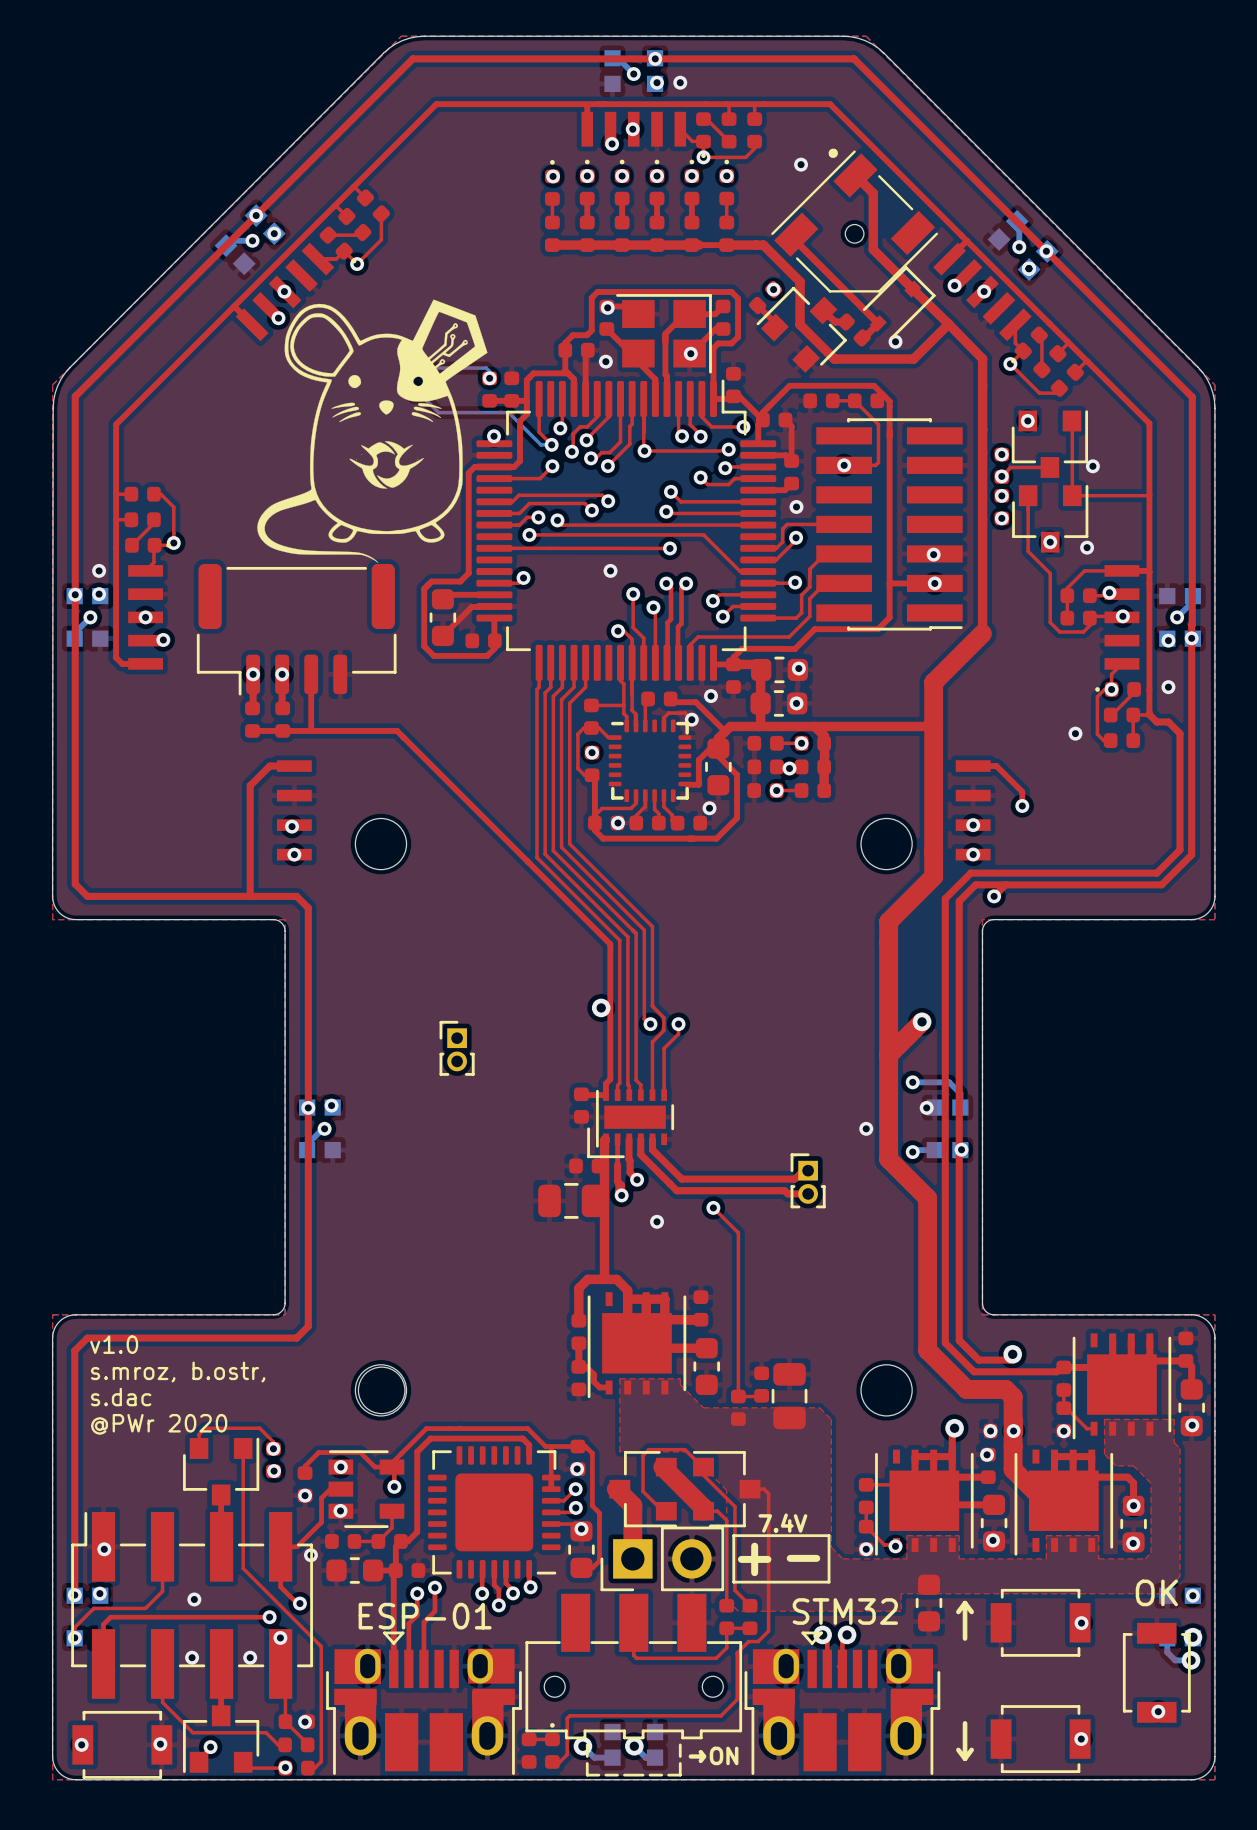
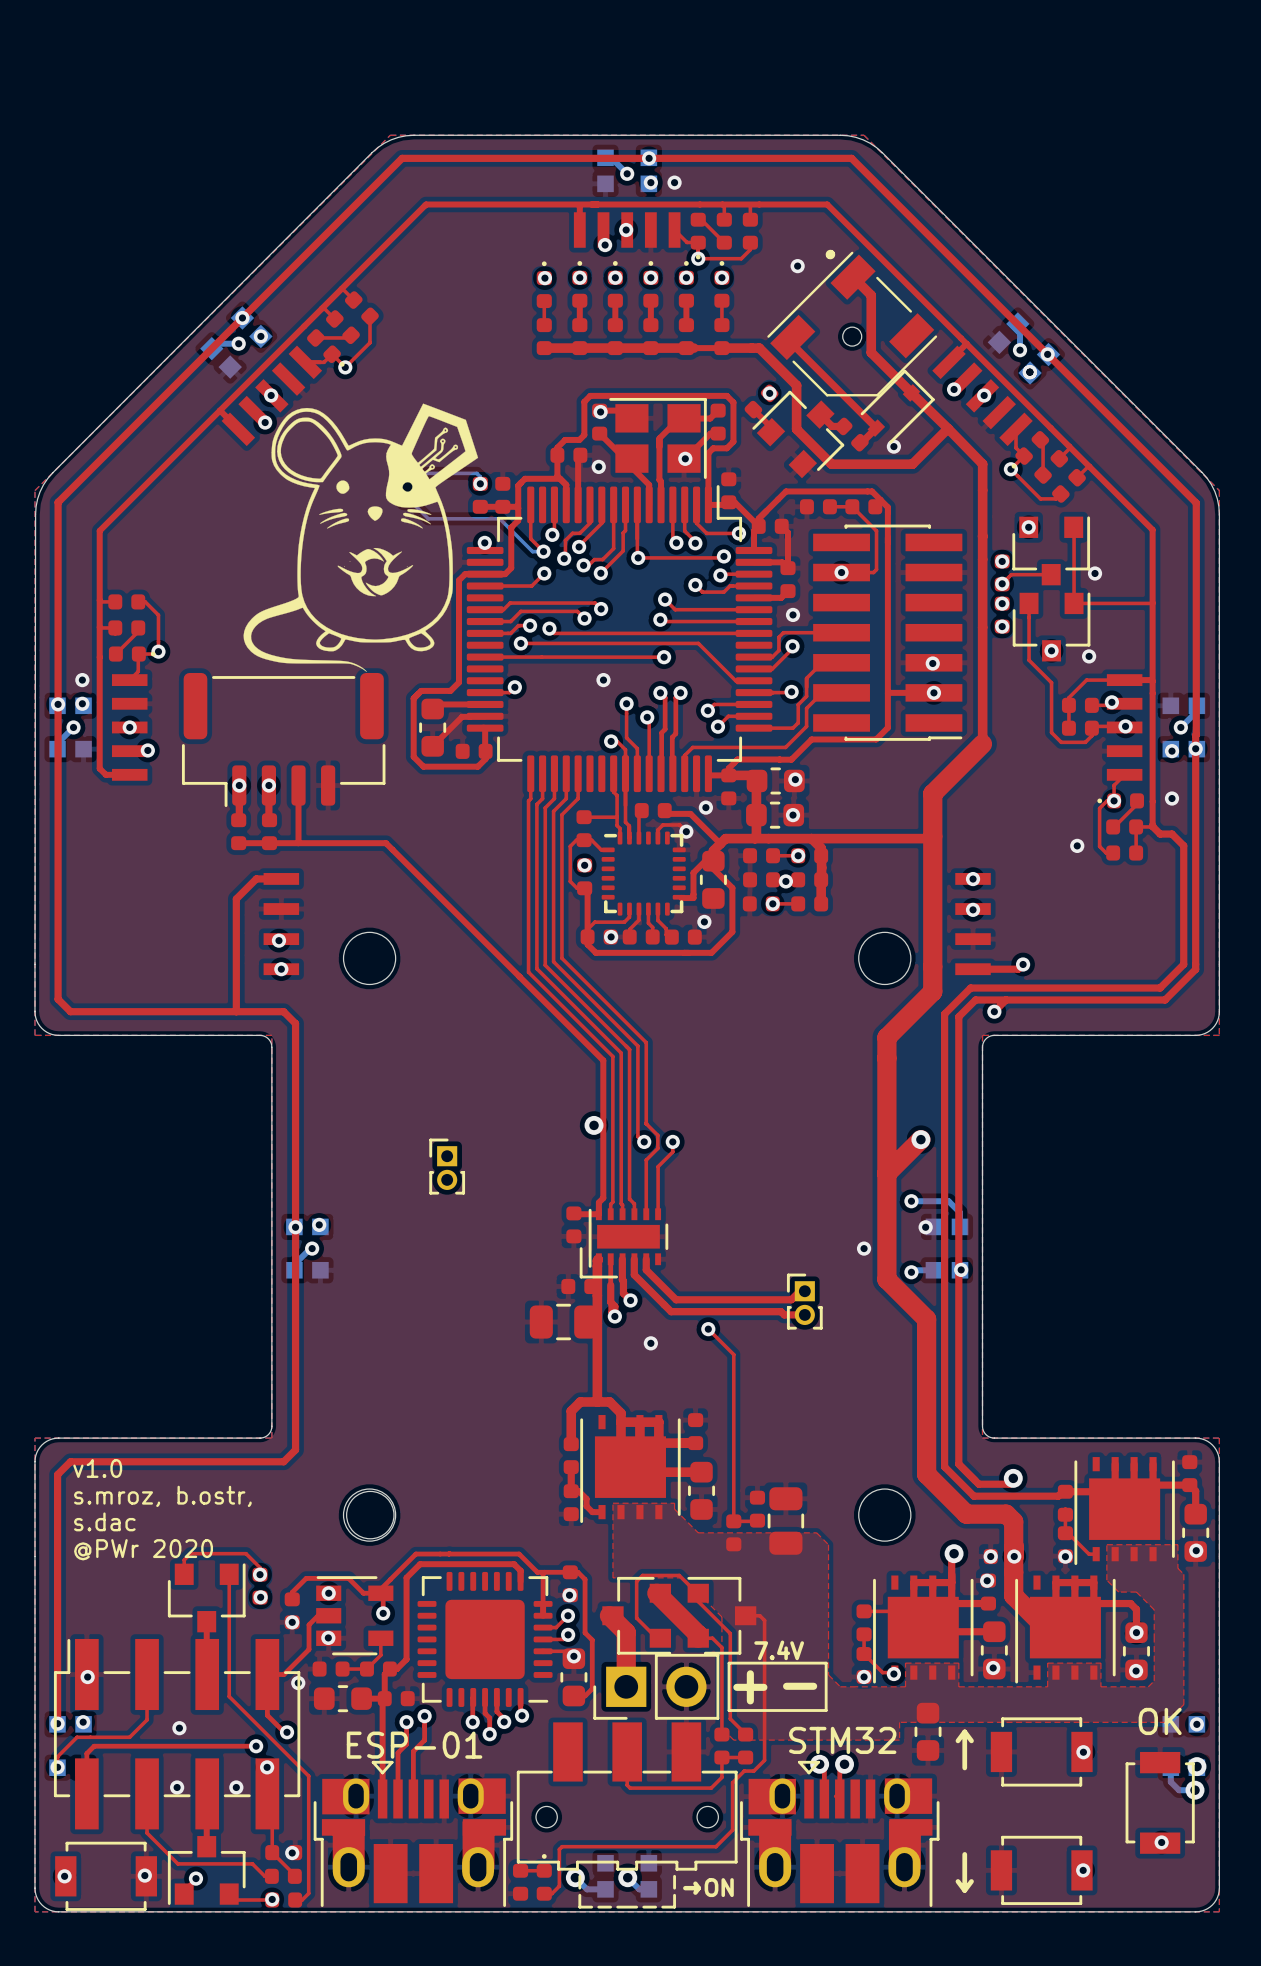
top track: (973, 766) (996, 766) (1022, 791) (1022, 805) -> none
via: none -> (973, 879)
via: none -> (973, 909)
via: (1022, 805) -> none
via: (973, 825) -> none
top track: none -> (1023, 964) (1018, 969) (973, 969)
via: none -> (1023, 964)
via: (973, 854) -> none

